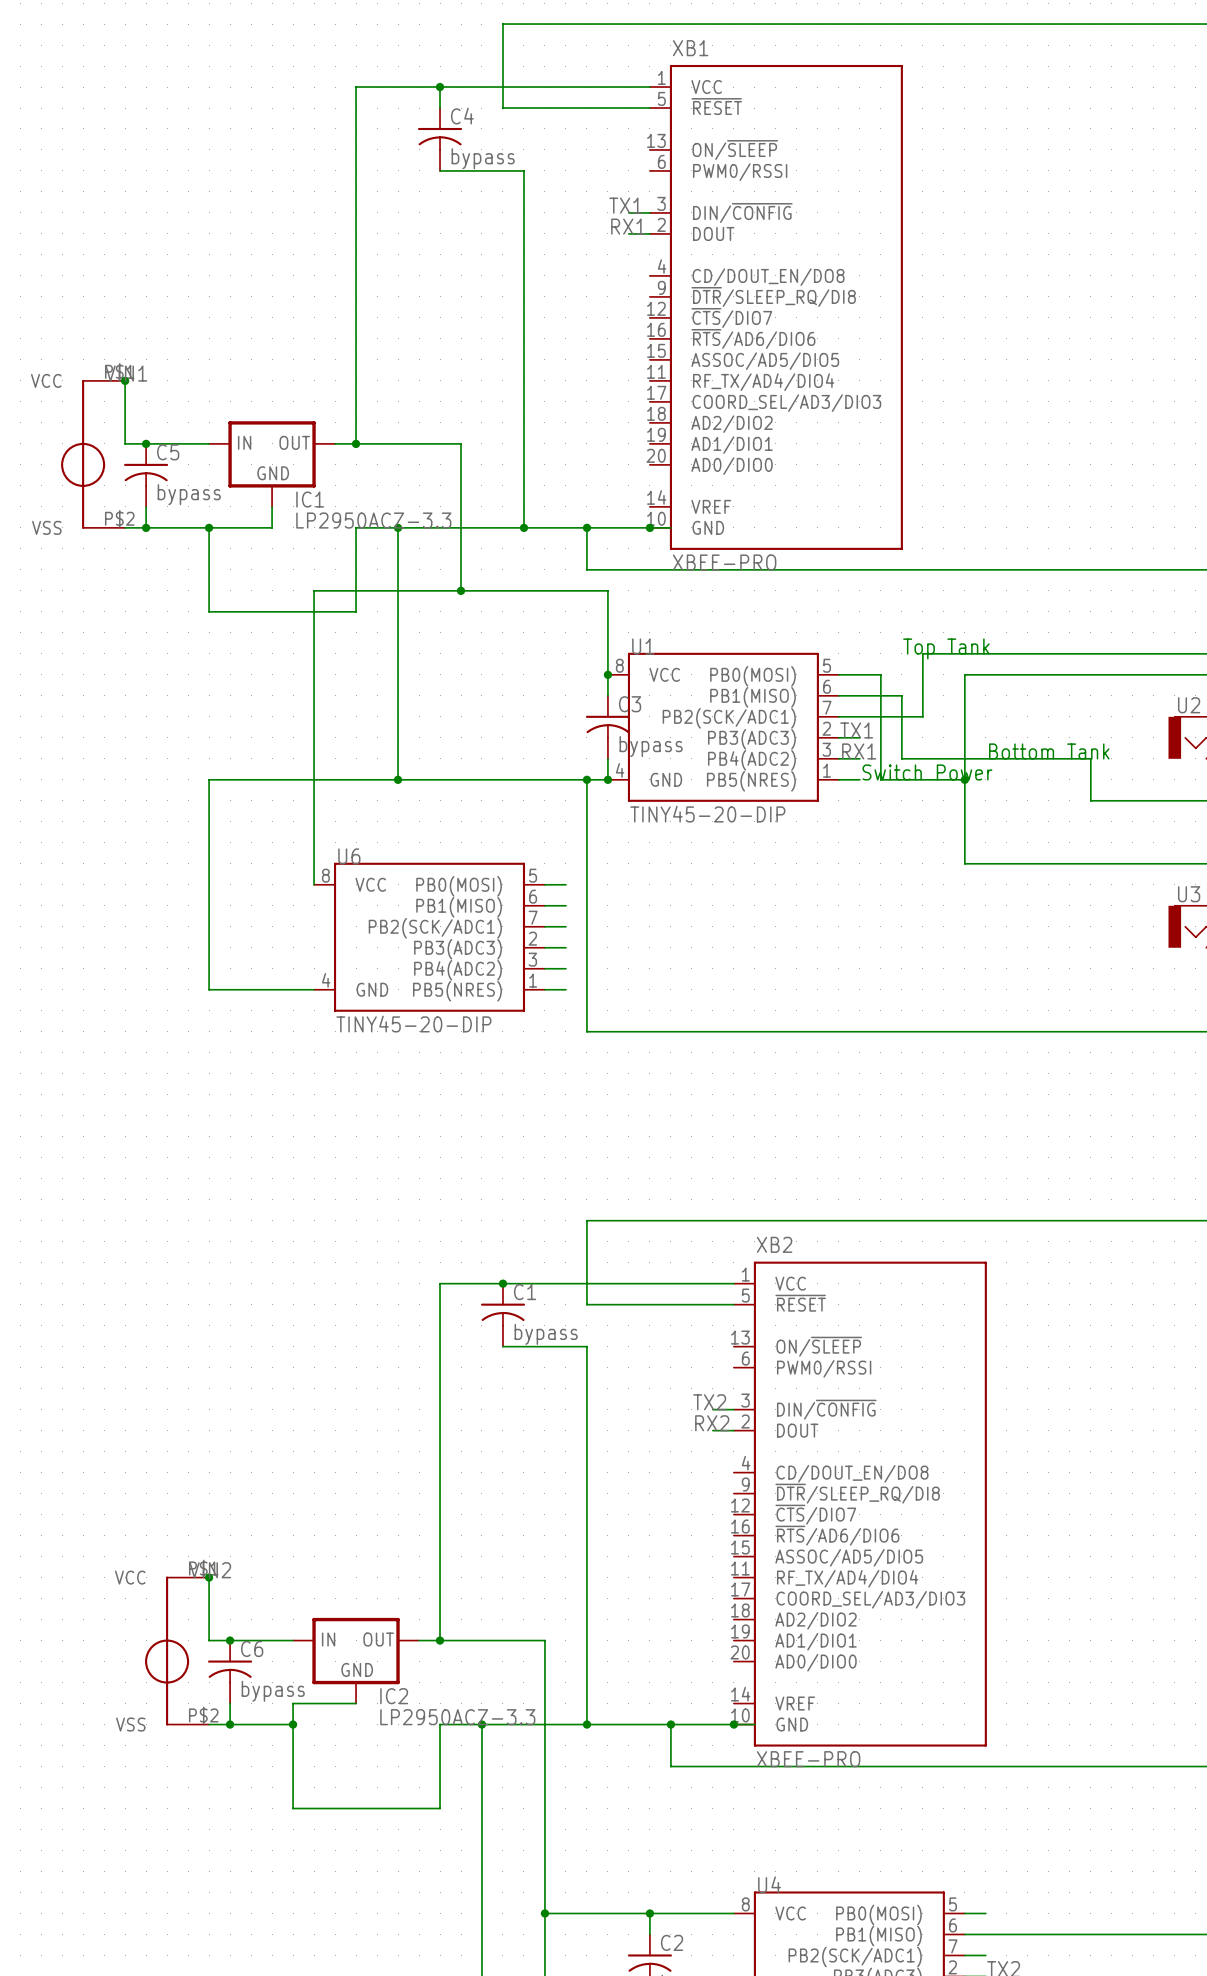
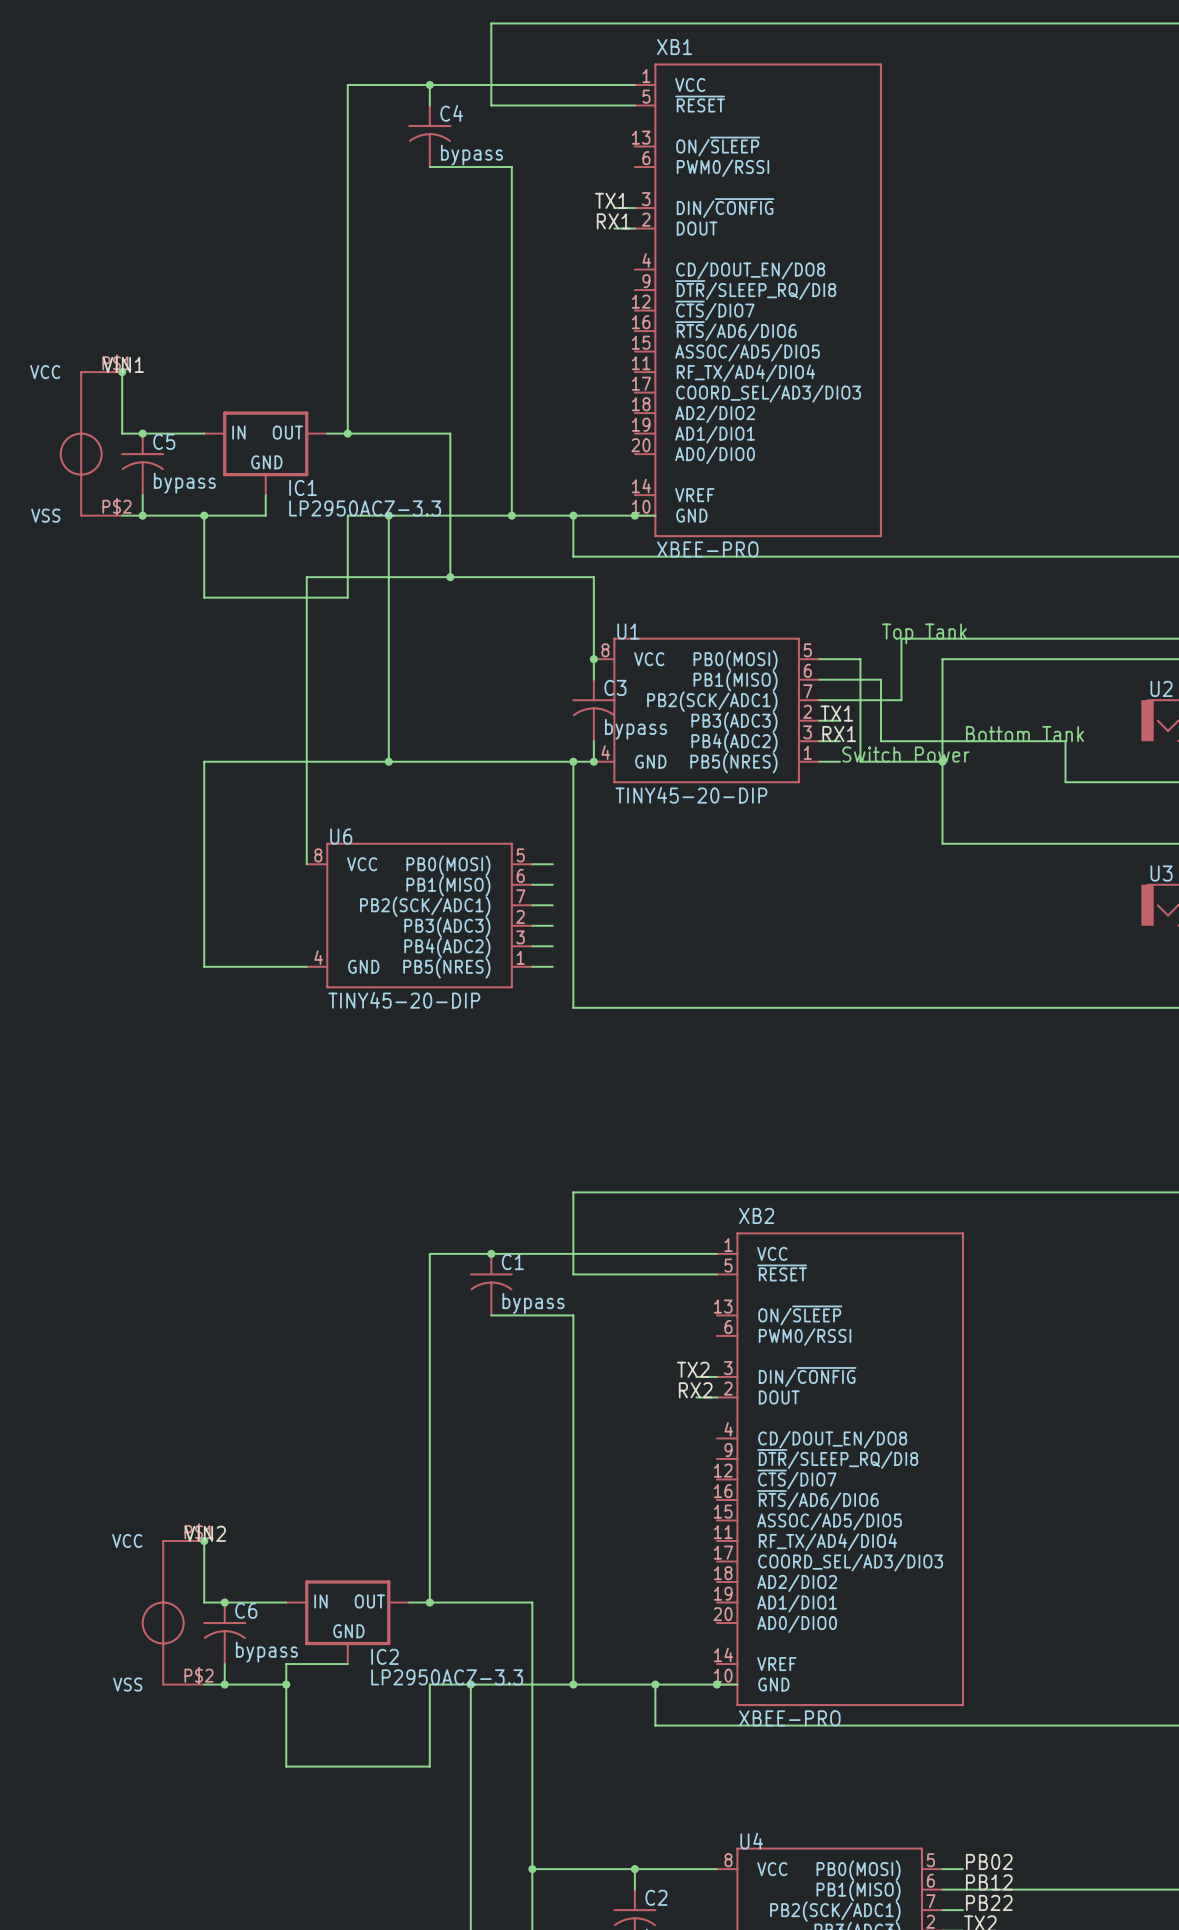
label: none -> PB02 (989, 1861)
label: none -> PB12 (989, 1882)
label: none -> PB22 (989, 1902)

